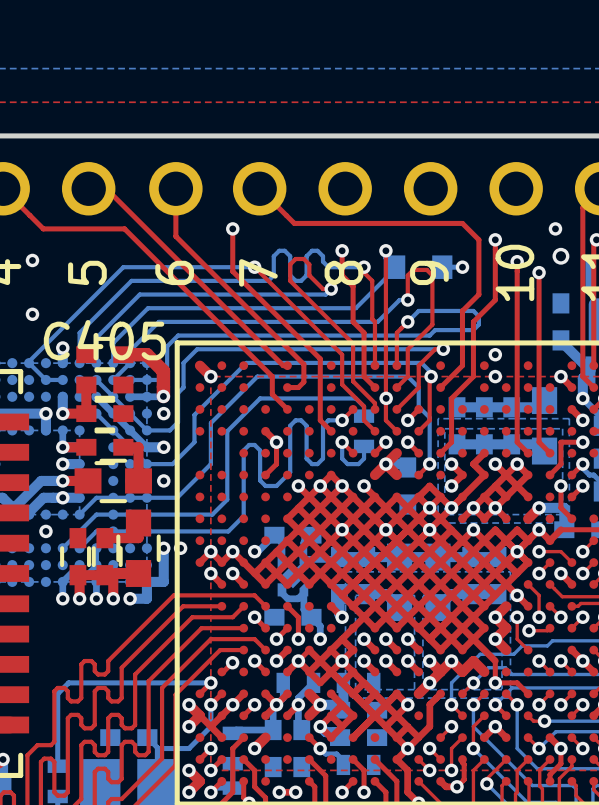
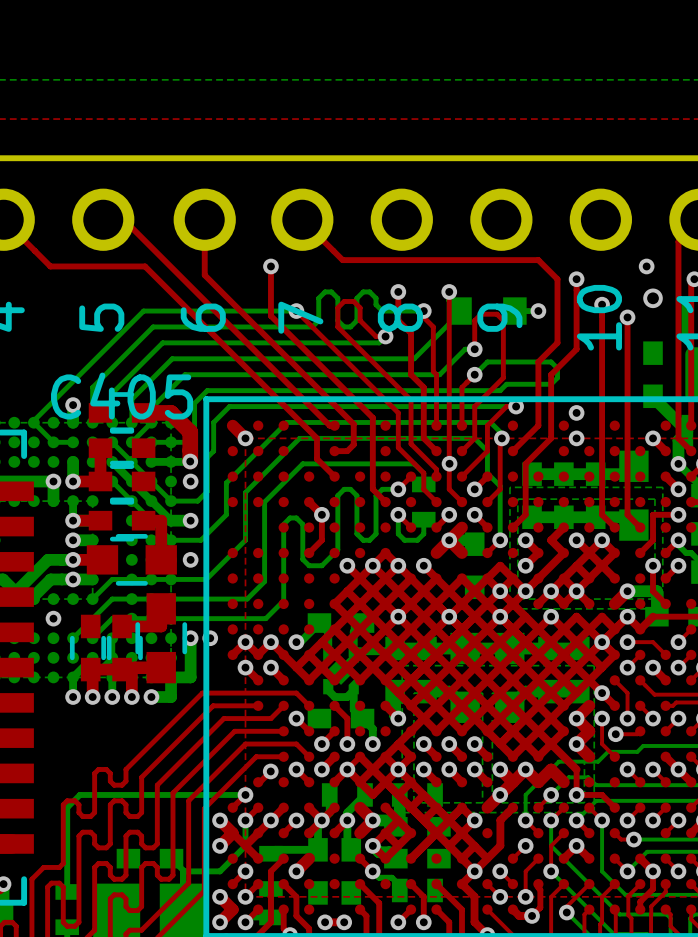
via: (32, 260) -> none
via: (32, 314) -> none

